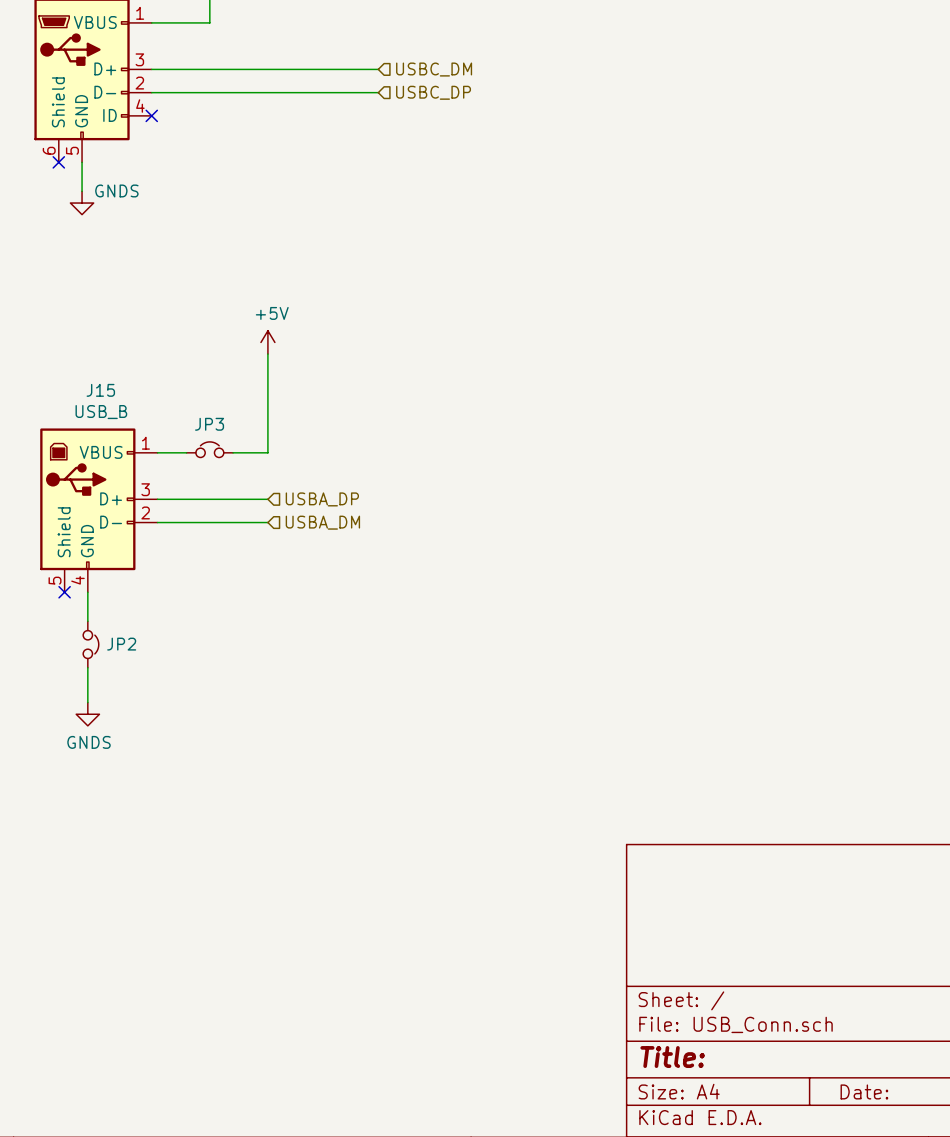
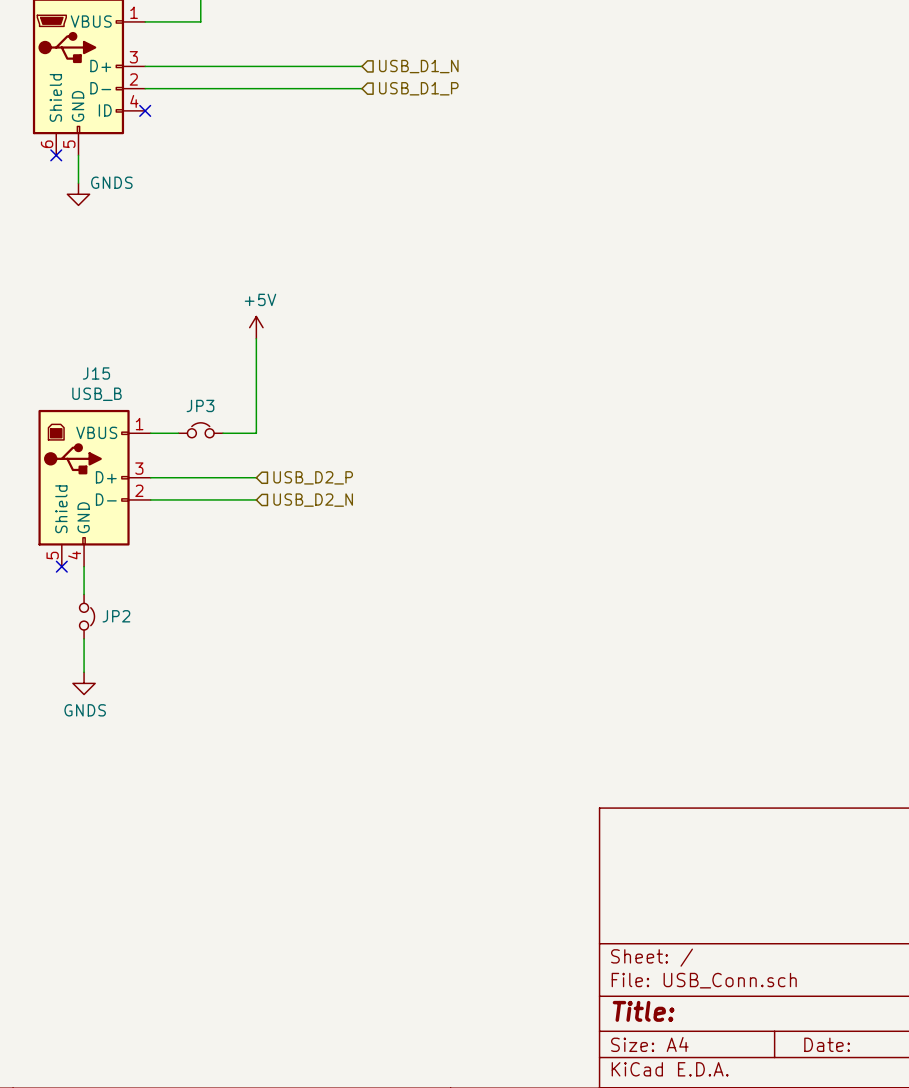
hierarchical label: USBC_DM (434, 69) -> USB_D1_N (418, 66)
hierarchical label: USBC_DP (433, 92) -> USB_D1_P (418, 88)
hierarchical label: USBA_DP (322, 499) -> USB_D2_P (313, 477)
hierarchical label: USBA_DM (322, 522) -> USB_D2_N (313, 500)

